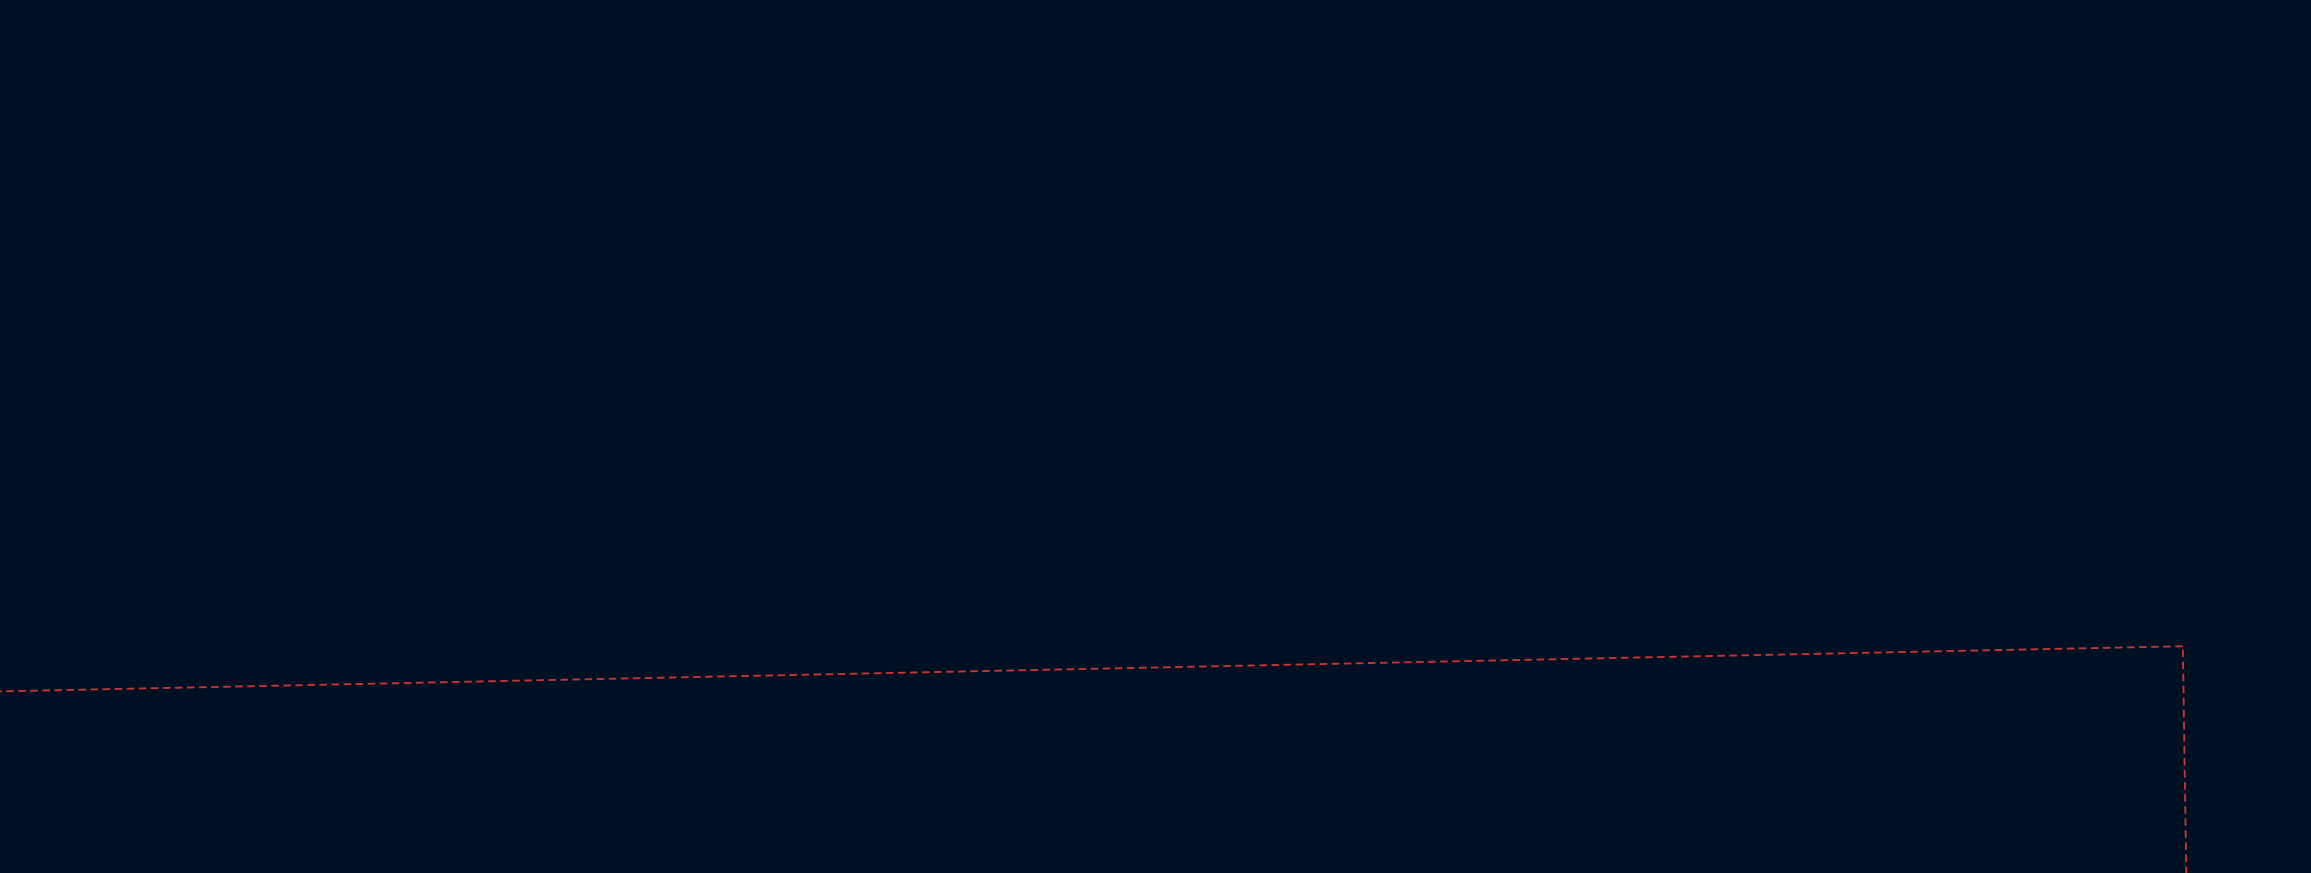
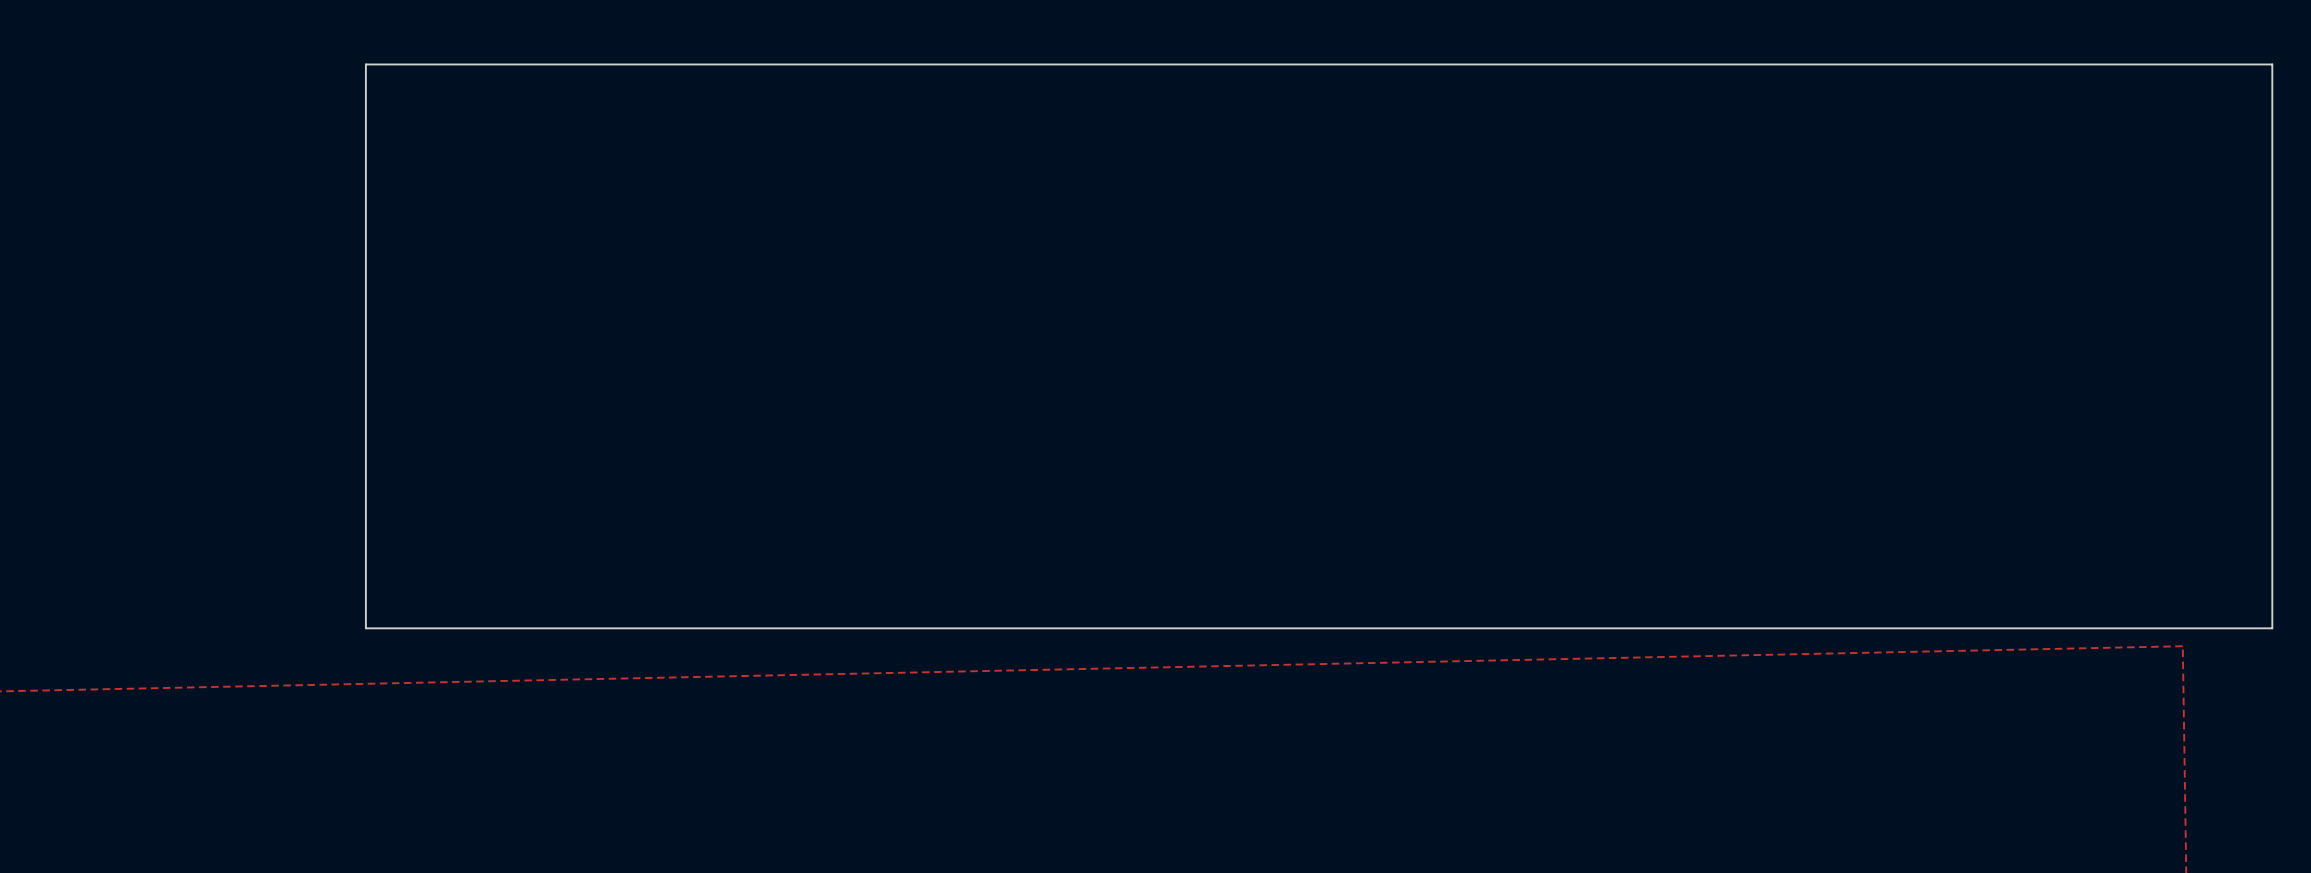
board edge: none -> (365, 64) (2272, 64) (2272, 628) (365, 628) (365, 64)

